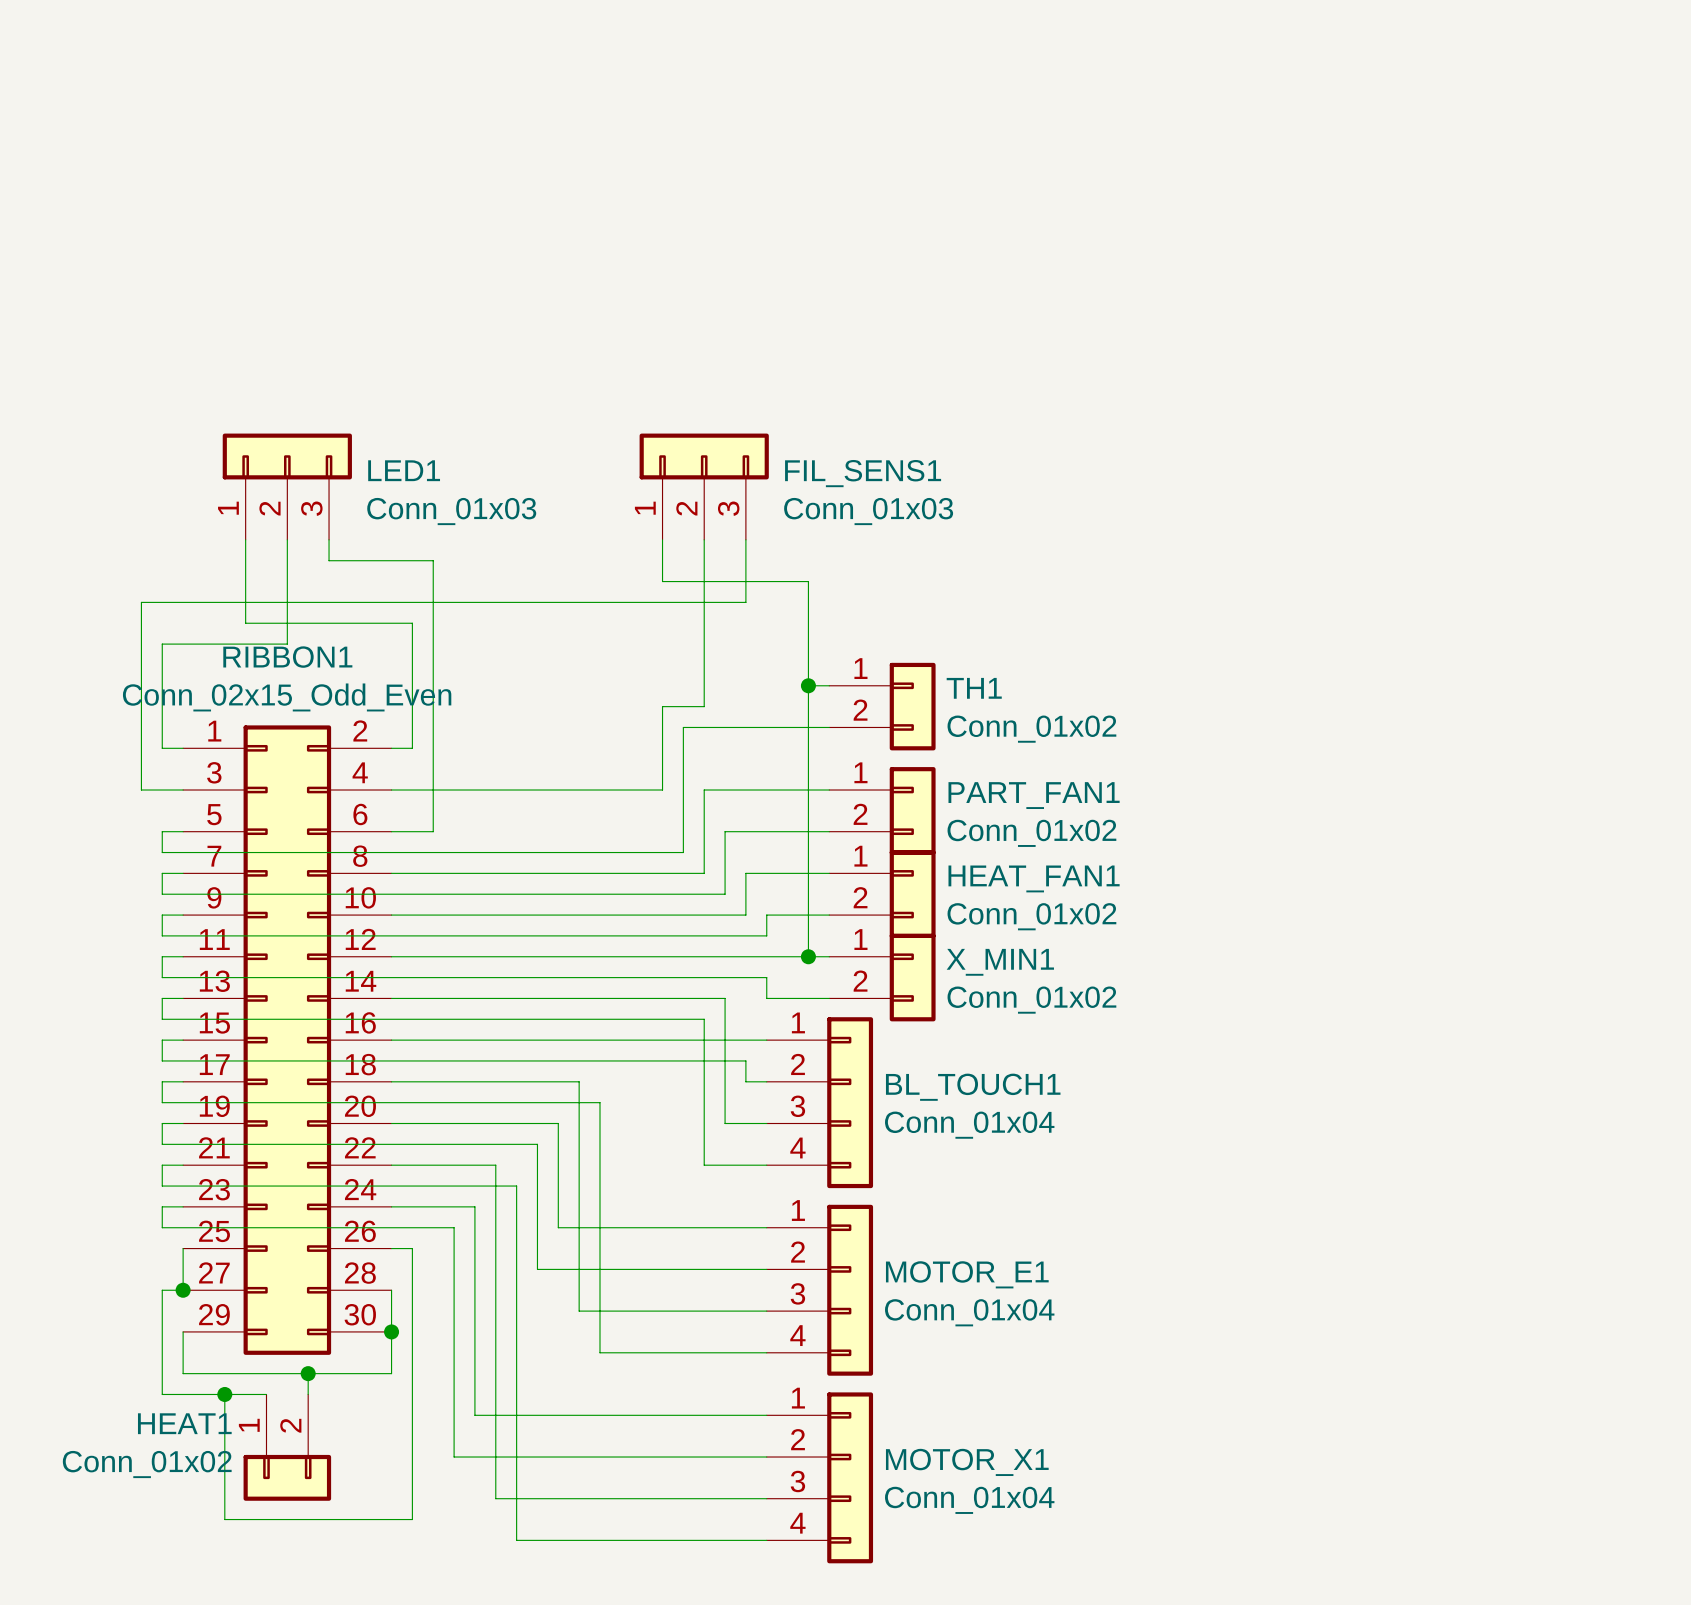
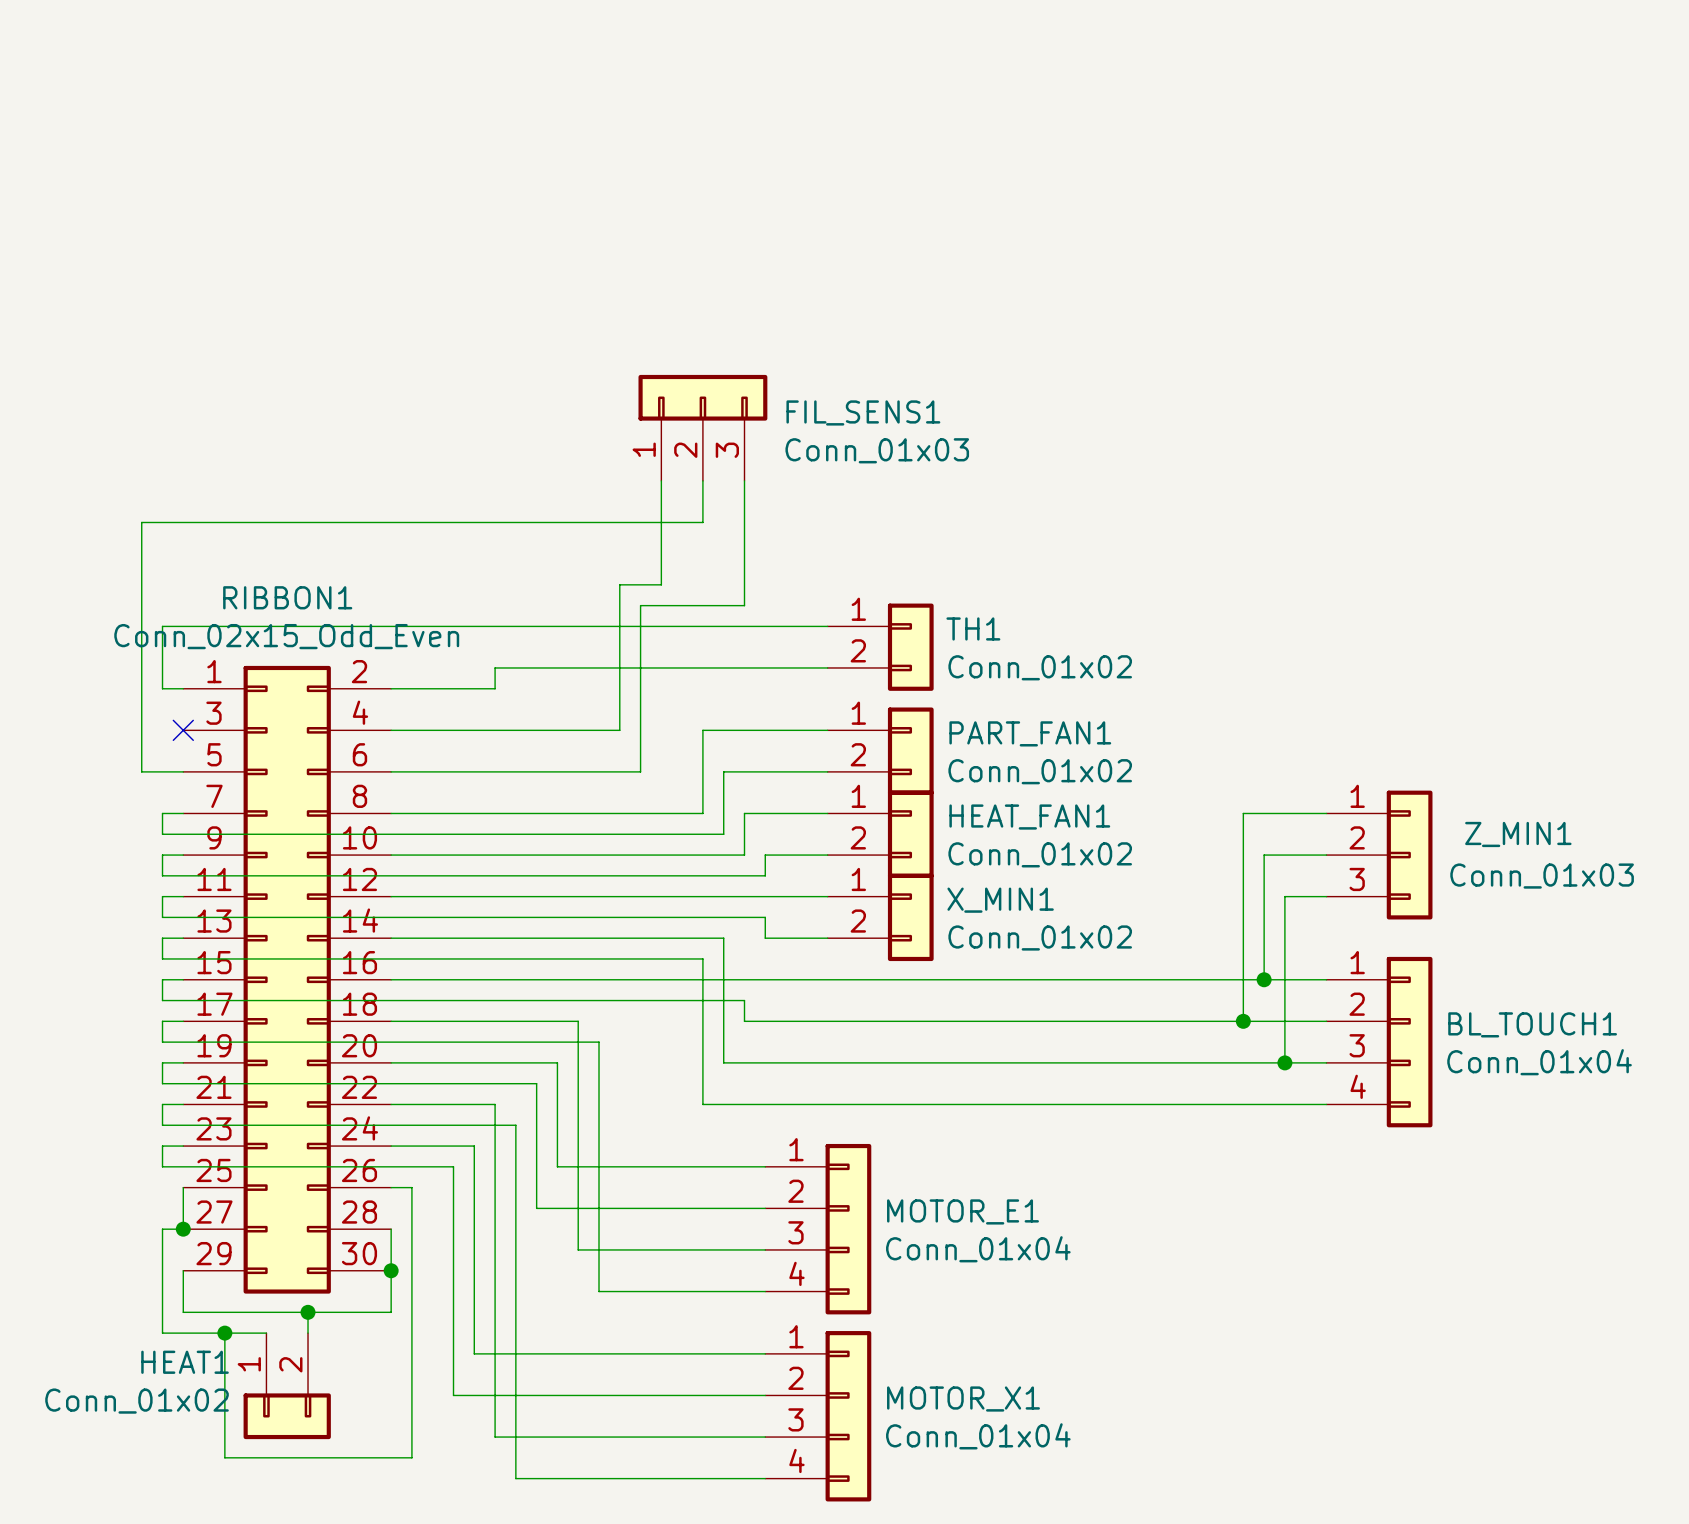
LED1: Conn_01x03 (287, 486) -> none
wire: (245, 539) (245, 623) (412, 623) (412, 748) -> none
wire: (287, 539) (287, 644) (162, 644) (162, 685) -> (806, 626) (162, 626)
wire: (329, 539) (329, 560) (433, 560) (433, 831) -> (744, 543) (744, 605) (640, 605) (640, 771) (432, 771)
wire: (141, 602) (745, 602) -> (141, 543) (141, 522) (661, 522) (661, 584) (619, 584) (619, 730)
junction: (808, 685) -> none
wire: (683, 727) (683, 852) (162, 852) (162, 831) -> (682, 667) (495, 667) (495, 688) (411, 688)
wire: (141, 790) (183, 790) -> (141, 730) (141, 771) (162, 771)
no-connect mark: none -> (183, 730)
wire: (620, 790) (662, 790) (662, 706) (704, 706) (704, 581) (808, 581) (808, 956) -> none
wire: none -> (1326, 813) (1243, 813) (1243, 1021)
wire: none -> (1326, 855) (1264, 855) (1264, 979)
Z_MIN1: none -> Conn_01x03 (1379, 855)
junction: (808, 956) -> none
wire: none -> (1326, 896) (1284, 896) (1284, 1062)
wire: none -> (765, 979) (1326, 979)
junction: none -> (1264, 979)
wire: none -> (765, 1021) (1326, 1021)
junction: none -> (1243, 1021)
BL_TOUCH1 position: (819, 1102) -> (1379, 1042)
wire: none -> (765, 1062) (1326, 1062)
junction: none -> (1284, 1062)
wire: none -> (765, 1104) (1326, 1104)

